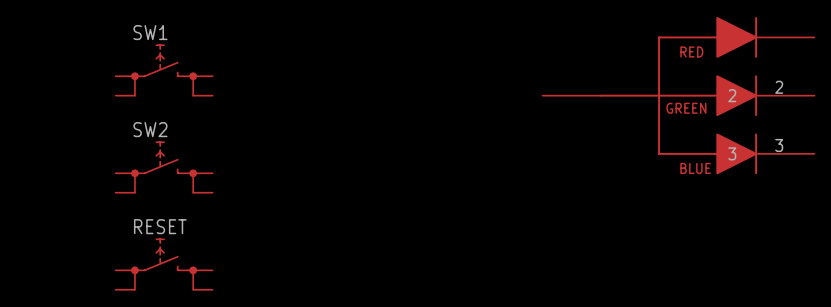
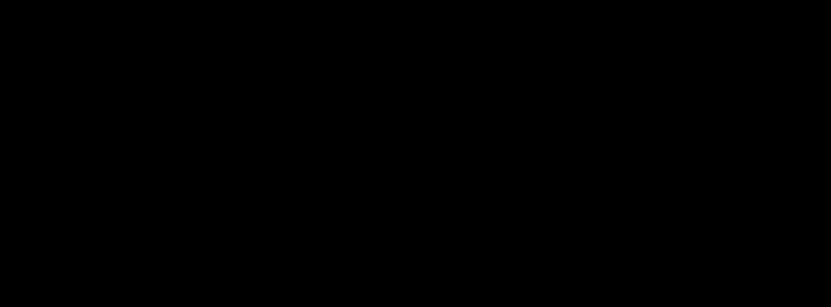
SW1: (164, 70) -> none
part: (678, 95) -> none
SW2: (164, 167) -> none
RESET: (164, 264) -> none

